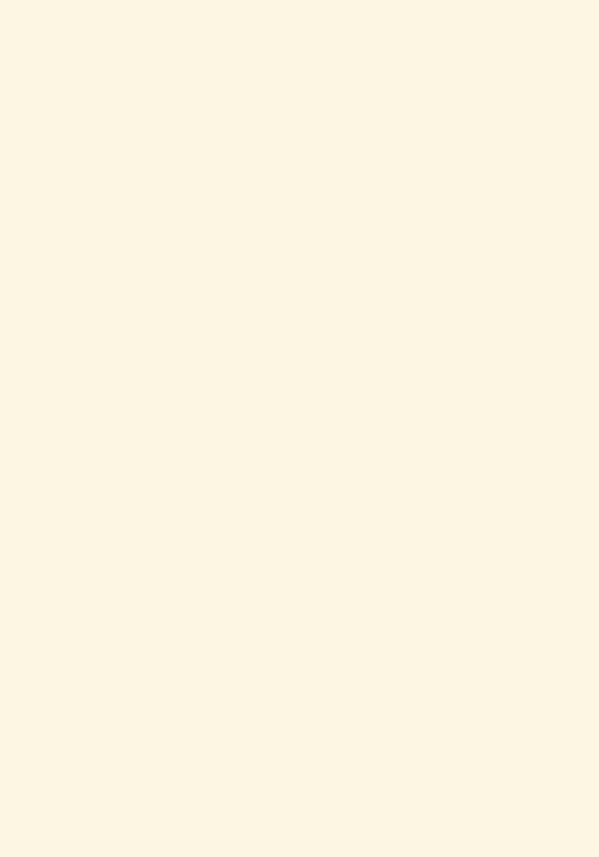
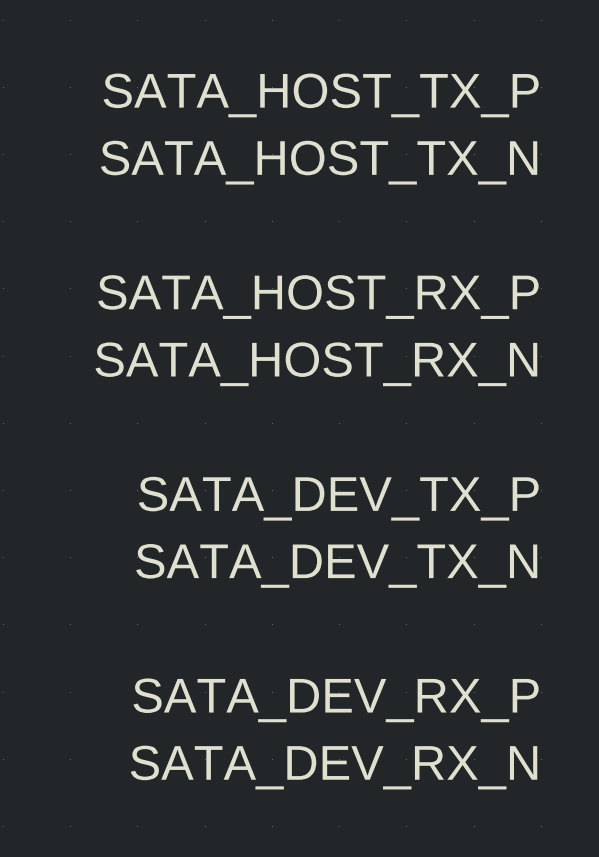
label: none -> SATA_HOST_TX_P (321, 95)
label: none -> SATA_HOST_TX_N (319, 162)
label: none -> SATA_HOST_RX_P (318, 297)
label: none -> SATA_HOST_RX_N (316, 364)
label: none -> SATA_DEV_TX_P (338, 498)
label: none -> SATA_DEV_TX_N (336, 565)
label: none -> SATA_DEV_RX_P (336, 700)
label: none -> SATA_DEV_RX_N (334, 767)

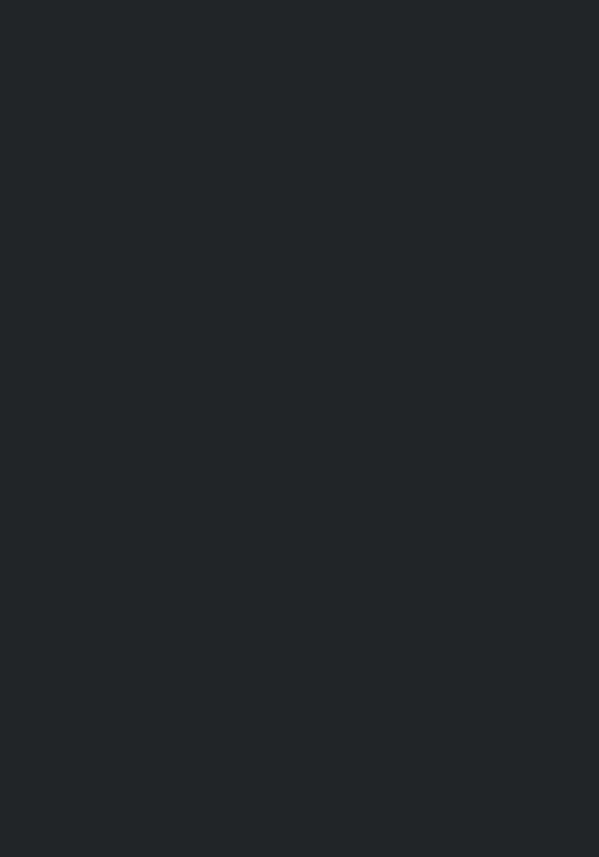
label: SATA_HOST_TX_P (321, 95) -> none
label: SATA_HOST_TX_N (319, 162) -> none
label: SATA_HOST_RX_P (318, 297) -> none
label: SATA_HOST_RX_N (316, 364) -> none
label: SATA_DEV_TX_P (338, 498) -> none
label: SATA_DEV_TX_N (336, 565) -> none
label: SATA_DEV_RX_P (336, 700) -> none
label: SATA_DEV_RX_N (334, 767) -> none

